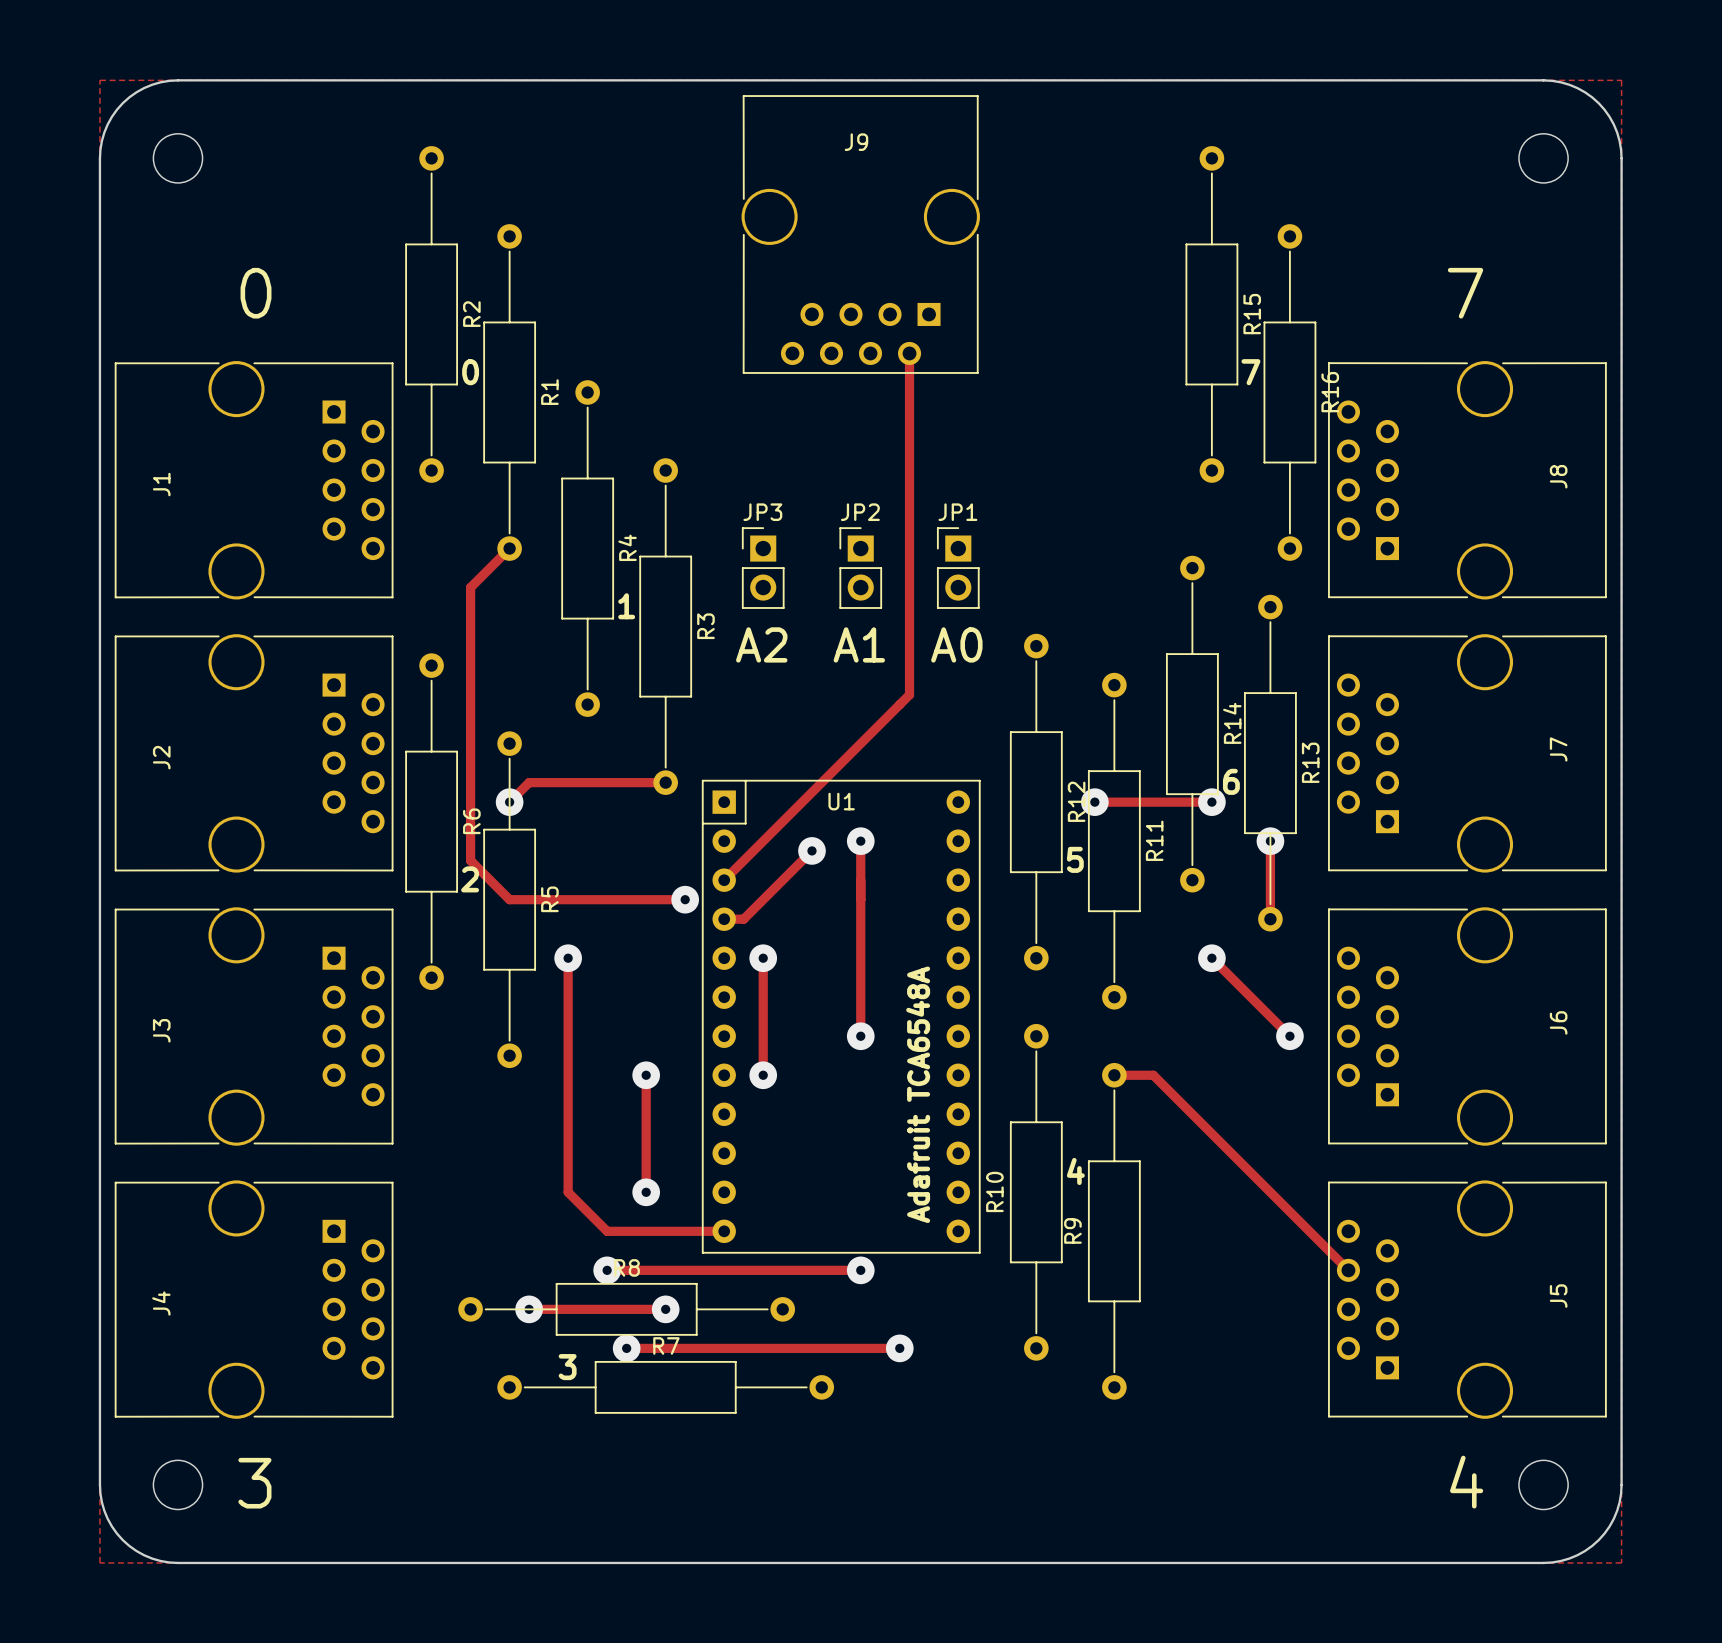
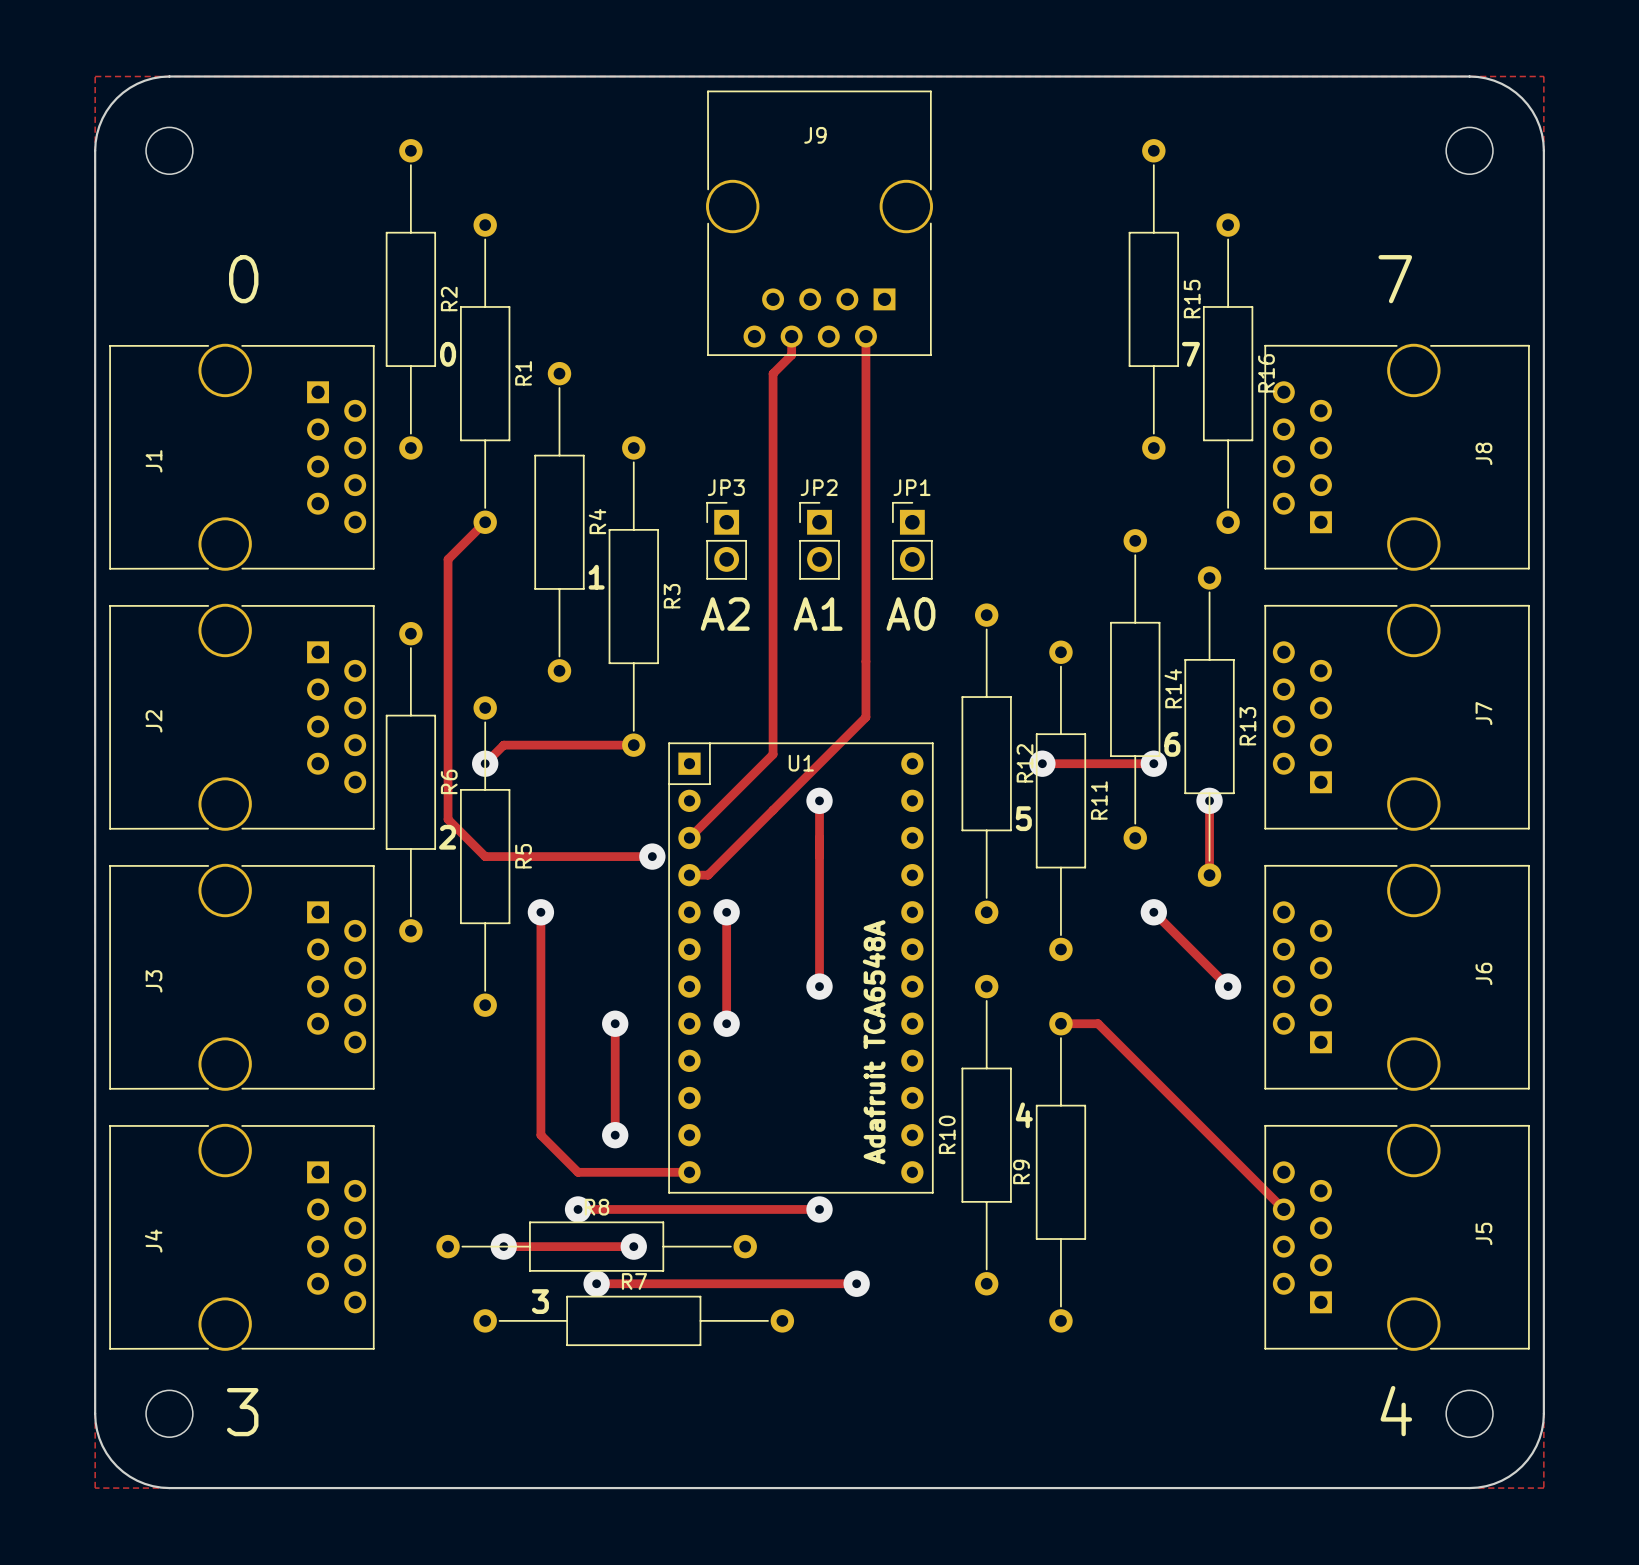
track: none -> (791, 336) (791, 355) (773, 373) (773, 754)
track: (909, 694) (811, 792) -> (865, 661) (865, 717) (773, 810)
via: (811, 850) -> none

